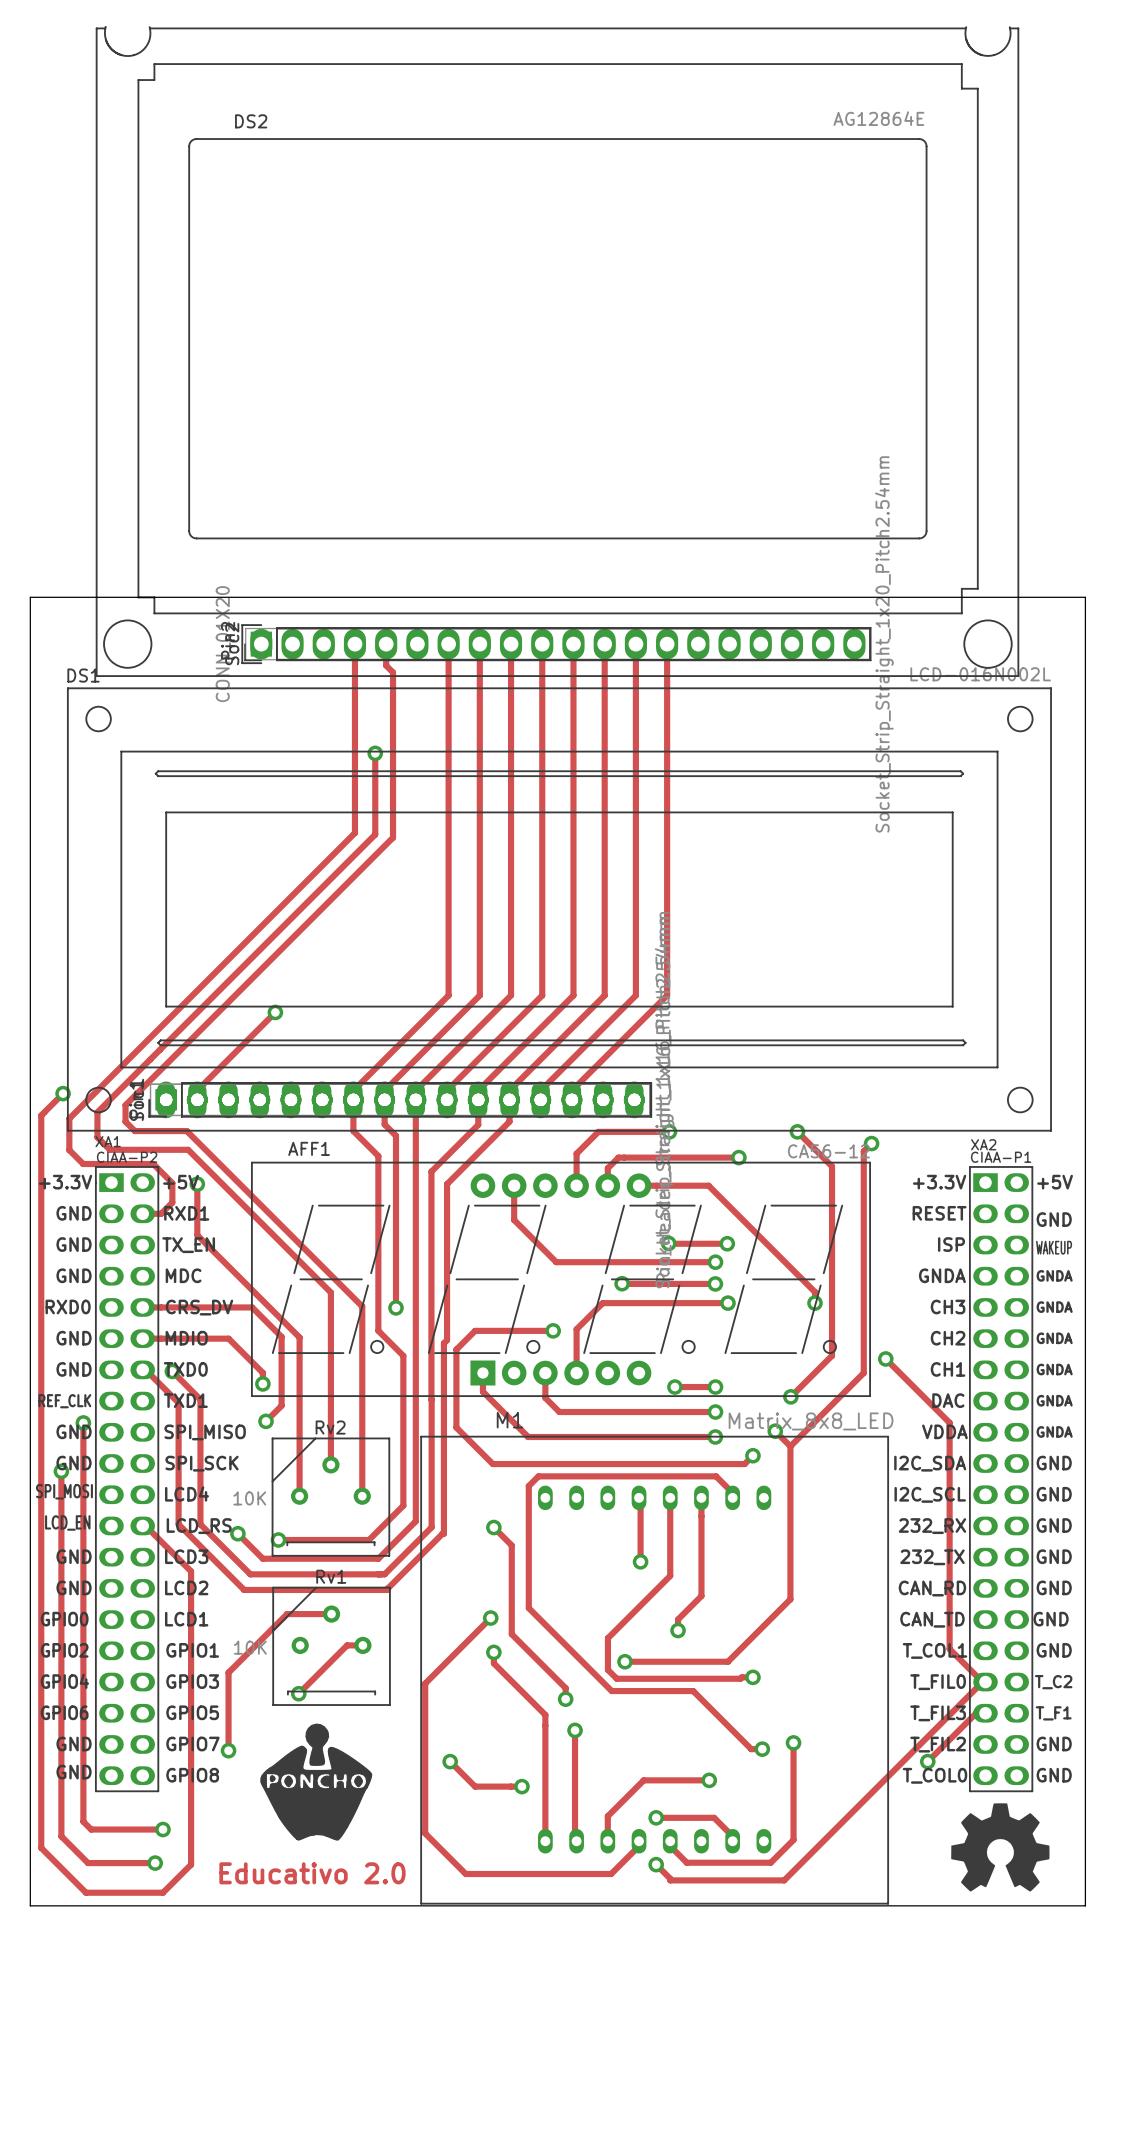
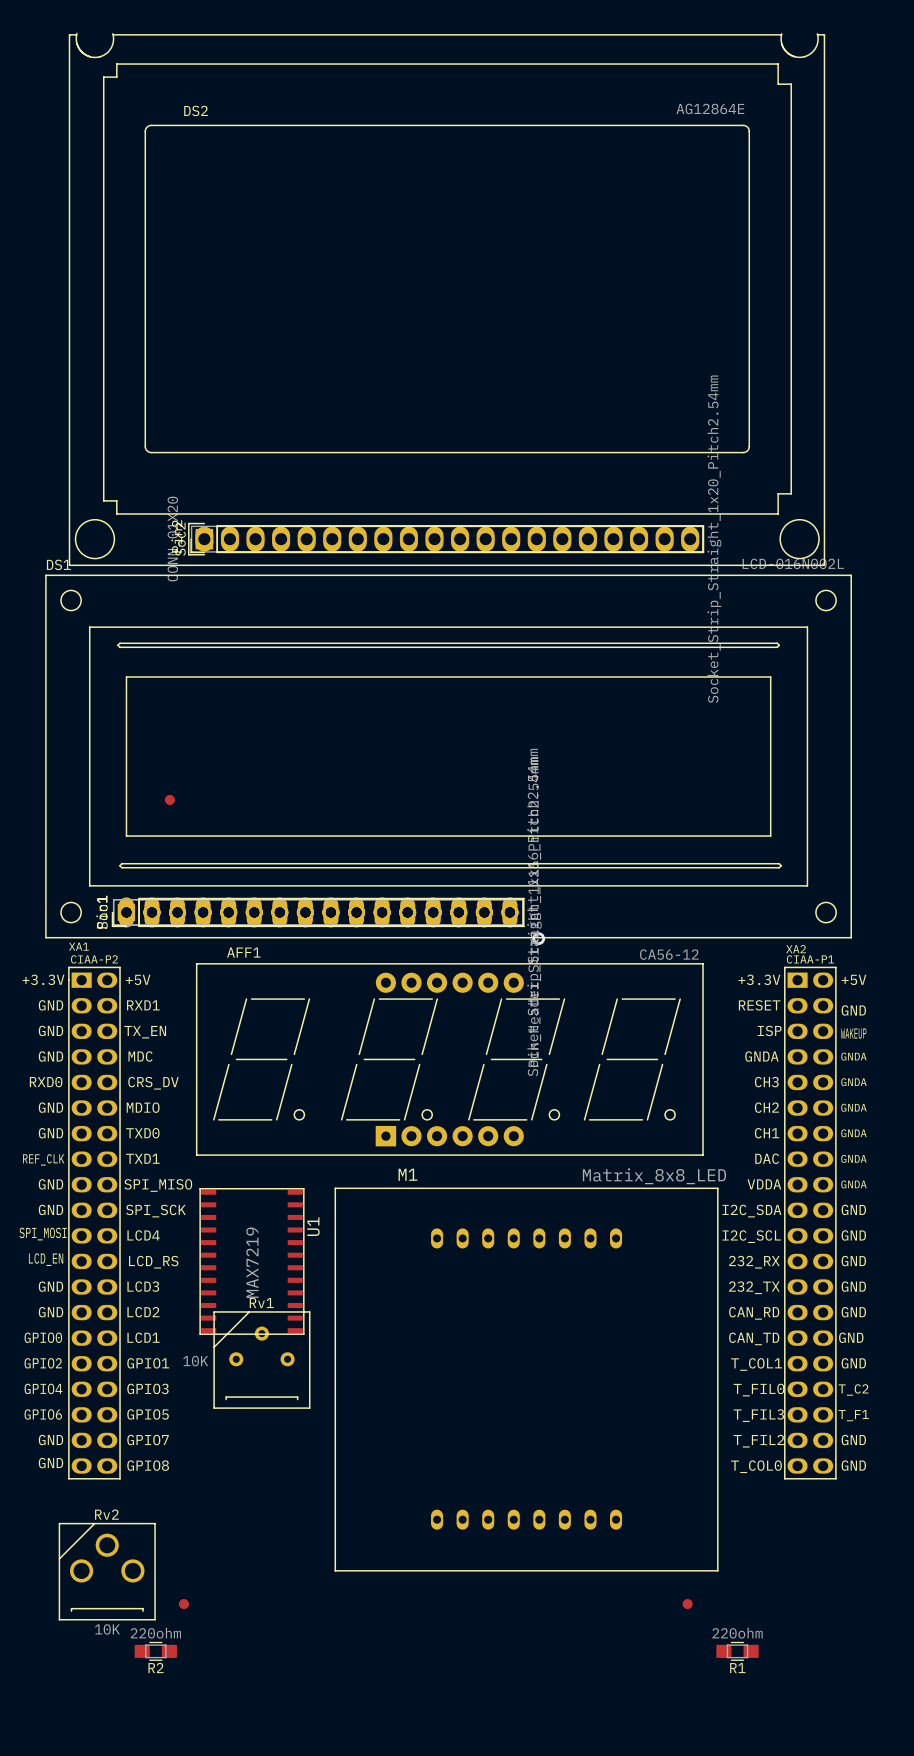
board edge: (30, 597) (30, 1905) (1085, 1905) (1085, 597) (30, 597) -> none
track: (354, 644) (354, 832) (69, 1118) (69, 1150) (83, 1164) (153, 1164) (172, 1183) (172, 1202) (161, 1213) (142, 1213) -> none
track: (386, 644) (386, 665) (393, 672) (393, 837) (125, 1105) (125, 1121) (134, 1131) (186, 1131) (362, 1306) (362, 1496) -> none
track: (448, 644) (448, 995) (353, 1090) (353, 1131) (378, 1156) (378, 1330) (403, 1355) (403, 1505) (369, 1540) (278, 1540) -> none
track: (479, 644) (479, 995) (384, 1090) (384, 1124) (396, 1135) (396, 1307) -> none
track: (511, 644) (511, 995) (415, 1090) (415, 1521) (378, 1558) (262, 1558) (237, 1533) -> none
track: (542, 644) (542, 995) (447, 1090) (447, 1099) -> none
track: (573, 644) (573, 995) (478, 1090) (478, 1124) (431, 1171) (431, 1527) (384, 1574) (250, 1574) (200, 1524) (200, 1399) (172, 1371) -> none
track: (604, 644) (604, 995) (509, 1090) (509, 1121) (447, 1184) (447, 1340) (443, 1343) (443, 1533) (387, 1589) (244, 1589) (178, 1524) (178, 1402) (145, 1369) (142, 1369) -> none
track: (635, 644) (635, 995) (540, 1090) (540, 1099) -> none
track: (667, 644) (667, 995) (571, 1090) (571, 1099) -> none
track: (375, 753) (375, 834) (97, 1112) (97, 1137) (109, 1149) (188, 1149) (330, 1292) (330, 1464) -> none
via: (375, 753) -> none
part: none -> (169, 799)
track: (275, 1012) (197, 1090) (197, 1099) -> none
via: (275, 1012) -> none
track: (63, 1093) (41, 1115) (41, 1847) (86, 1892) (162, 1892) (191, 1864) (191, 1571) (145, 1525) (142, 1525) -> none
via: (63, 1093) -> none
track: (669, 1131) (598, 1131) (576, 1153) (576, 1185) -> none
track: (797, 1131) (832, 1166) (832, 1355) (790, 1396) -> none
via: (797, 1131) -> none
track: (871, 1143) (863, 1151) (863, 1373) (790, 1446) -> none
via: (871, 1143) -> none
track: (738, 1157) (618, 1157) (607, 1168) (607, 1185) -> none
via: (738, 1157) -> none
track: (197, 1184) (197, 1235) (299, 1337) (299, 1496) -> none
via: (197, 1184) -> none
track: (514, 1185) (514, 1220) (556, 1262) (715, 1262) -> none
track: (639, 1185) (708, 1185) (815, 1292) (815, 1303) -> none
track: (668, 1243) (726, 1243) -> none
via: (668, 1243) -> none
via: (727, 1243) -> none
via: (715, 1262) -> none
track: (622, 1283) (715, 1283) -> none
via: (622, 1283) -> none
via: (715, 1283) -> none
track: (727, 1303) (602, 1303) (576, 1329) (576, 1373) -> none
via: (727, 1303) -> none
via: (815, 1303) -> none
via: (396, 1307) -> none
track: (144, 1309) (142, 1307) (252, 1307) (281, 1336) (281, 1405) (266, 1421) -> none
track: (553, 1330) (475, 1330) (456, 1349) (456, 1427) (492, 1464) (744, 1464) (752, 1455) -> none
via: (553, 1330) -> none
track: (145, 1341) (142, 1338) (228, 1338) (262, 1372) (262, 1383) -> none
track: (885, 1358) (949, 1422) (949, 1649) (982, 1682) -> none
via: (885, 1358) -> none
via: (172, 1371) -> none
track: (482, 1373) (482, 1391) (528, 1436) (715, 1436) -> none
track: (545, 1373) (545, 1397) (559, 1412) (715, 1412) -> none
via: (262, 1383) -> none
track: (674, 1387) (715, 1387) -> none
via: (674, 1387) -> none
via: (715, 1387) -> none
via: (790, 1396) -> none
via: (715, 1412) -> none
via: (266, 1421) -> none
via: (83, 1422) -> none
track: (83, 1423) (83, 1821) (91, 1829) (162, 1829) -> none
track: (775, 1431) (790, 1446) -> none
via: (775, 1431) -> none
via: (715, 1436) -> none
Rv2 footprint: [271, 1437, 391, 1557] -> [58, 1522, 156, 1621]
track: (790, 1446) (790, 1599) (727, 1661) (624, 1661) -> none
via: (752, 1455) -> none
track: (61, 1471) (61, 1836) (88, 1863) (155, 1863) -> none
via: (61, 1471) -> none
track: (639, 1497) (640, 1499) (640, 1561) -> none
track: (670, 1497) (670, 1575) (607, 1638) (607, 1669) (616, 1678) (752, 1677) -> none
track: (701, 1497) (701, 1596) (678, 1619) (678, 1630) -> none
track: (732, 1497) (732, 1492) (716, 1476) (538, 1476) (528, 1486) (528, 1608) (611, 1691) (693, 1691) (751, 1749) (762, 1749) -> none
Rv2 value position: 10K (249, 1498) -> 10K (107, 1629)
U1: none -> MAX7219 (251, 1261)
track: (493, 1527) (511, 1545) (511, 1634) (565, 1688) (565, 1699) -> none
via: (493, 1527) -> none
via: (237, 1533) -> none
via: (278, 1540) -> none
via: (640, 1561) -> none
track: (331, 1614) (287, 1614) (228, 1672) (228, 1750) -> none
track: (490, 1618) (425, 1683) (425, 1833) (465, 1874) (611, 1874) (639, 1846) (639, 1841) -> none
via: (490, 1618) -> none
via: (678, 1630) -> none
track: (362, 1645) (347, 1645) (298, 1693) -> none
track: (493, 1652) (493, 1663) (545, 1714) (545, 1841) -> none
via: (493, 1652) -> none
via: (624, 1661) -> none
via: (752, 1677) -> none
track: (982, 1682) (784, 1880) (670, 1880) (656, 1864) -> none
via: (298, 1693) -> none
via: (565, 1699) -> none
track: (985, 1713) (976, 1713) (927, 1761) -> none
drawing: [260, 1723, 373, 1841] -> none
track: (575, 1730) (575, 1839) (576, 1841) -> none
via: (575, 1730) -> none
track: (793, 1742) (793, 1839) (770, 1862) (686, 1862) (670, 1846) (670, 1841) -> none
via: (793, 1742) -> none
via: (762, 1749) -> none
via: (228, 1750) -> none
track: (450, 1761) (475, 1786) (521, 1786) -> none
via: (450, 1761) -> none
via: (927, 1761) -> none
track: (709, 1780) (643, 1780) (607, 1816) (607, 1841) -> none
via: (709, 1780) -> none
via: (521, 1786) -> none
drawing: [951, 1803, 1050, 1892] -> none
track: (656, 1817) (714, 1817) (732, 1836) (732, 1841) -> none
via: (656, 1817) -> none
via: (162, 1829) -> none
via: (155, 1863) -> none
via: (656, 1864) -> none
text: Educativo 2.0 (312, 1873) -> none
part: none -> (183, 1604)
part: none -> (687, 1604)
R2: none -> 220ohm (155, 1651)
R1: none -> 220ohm (737, 1651)

